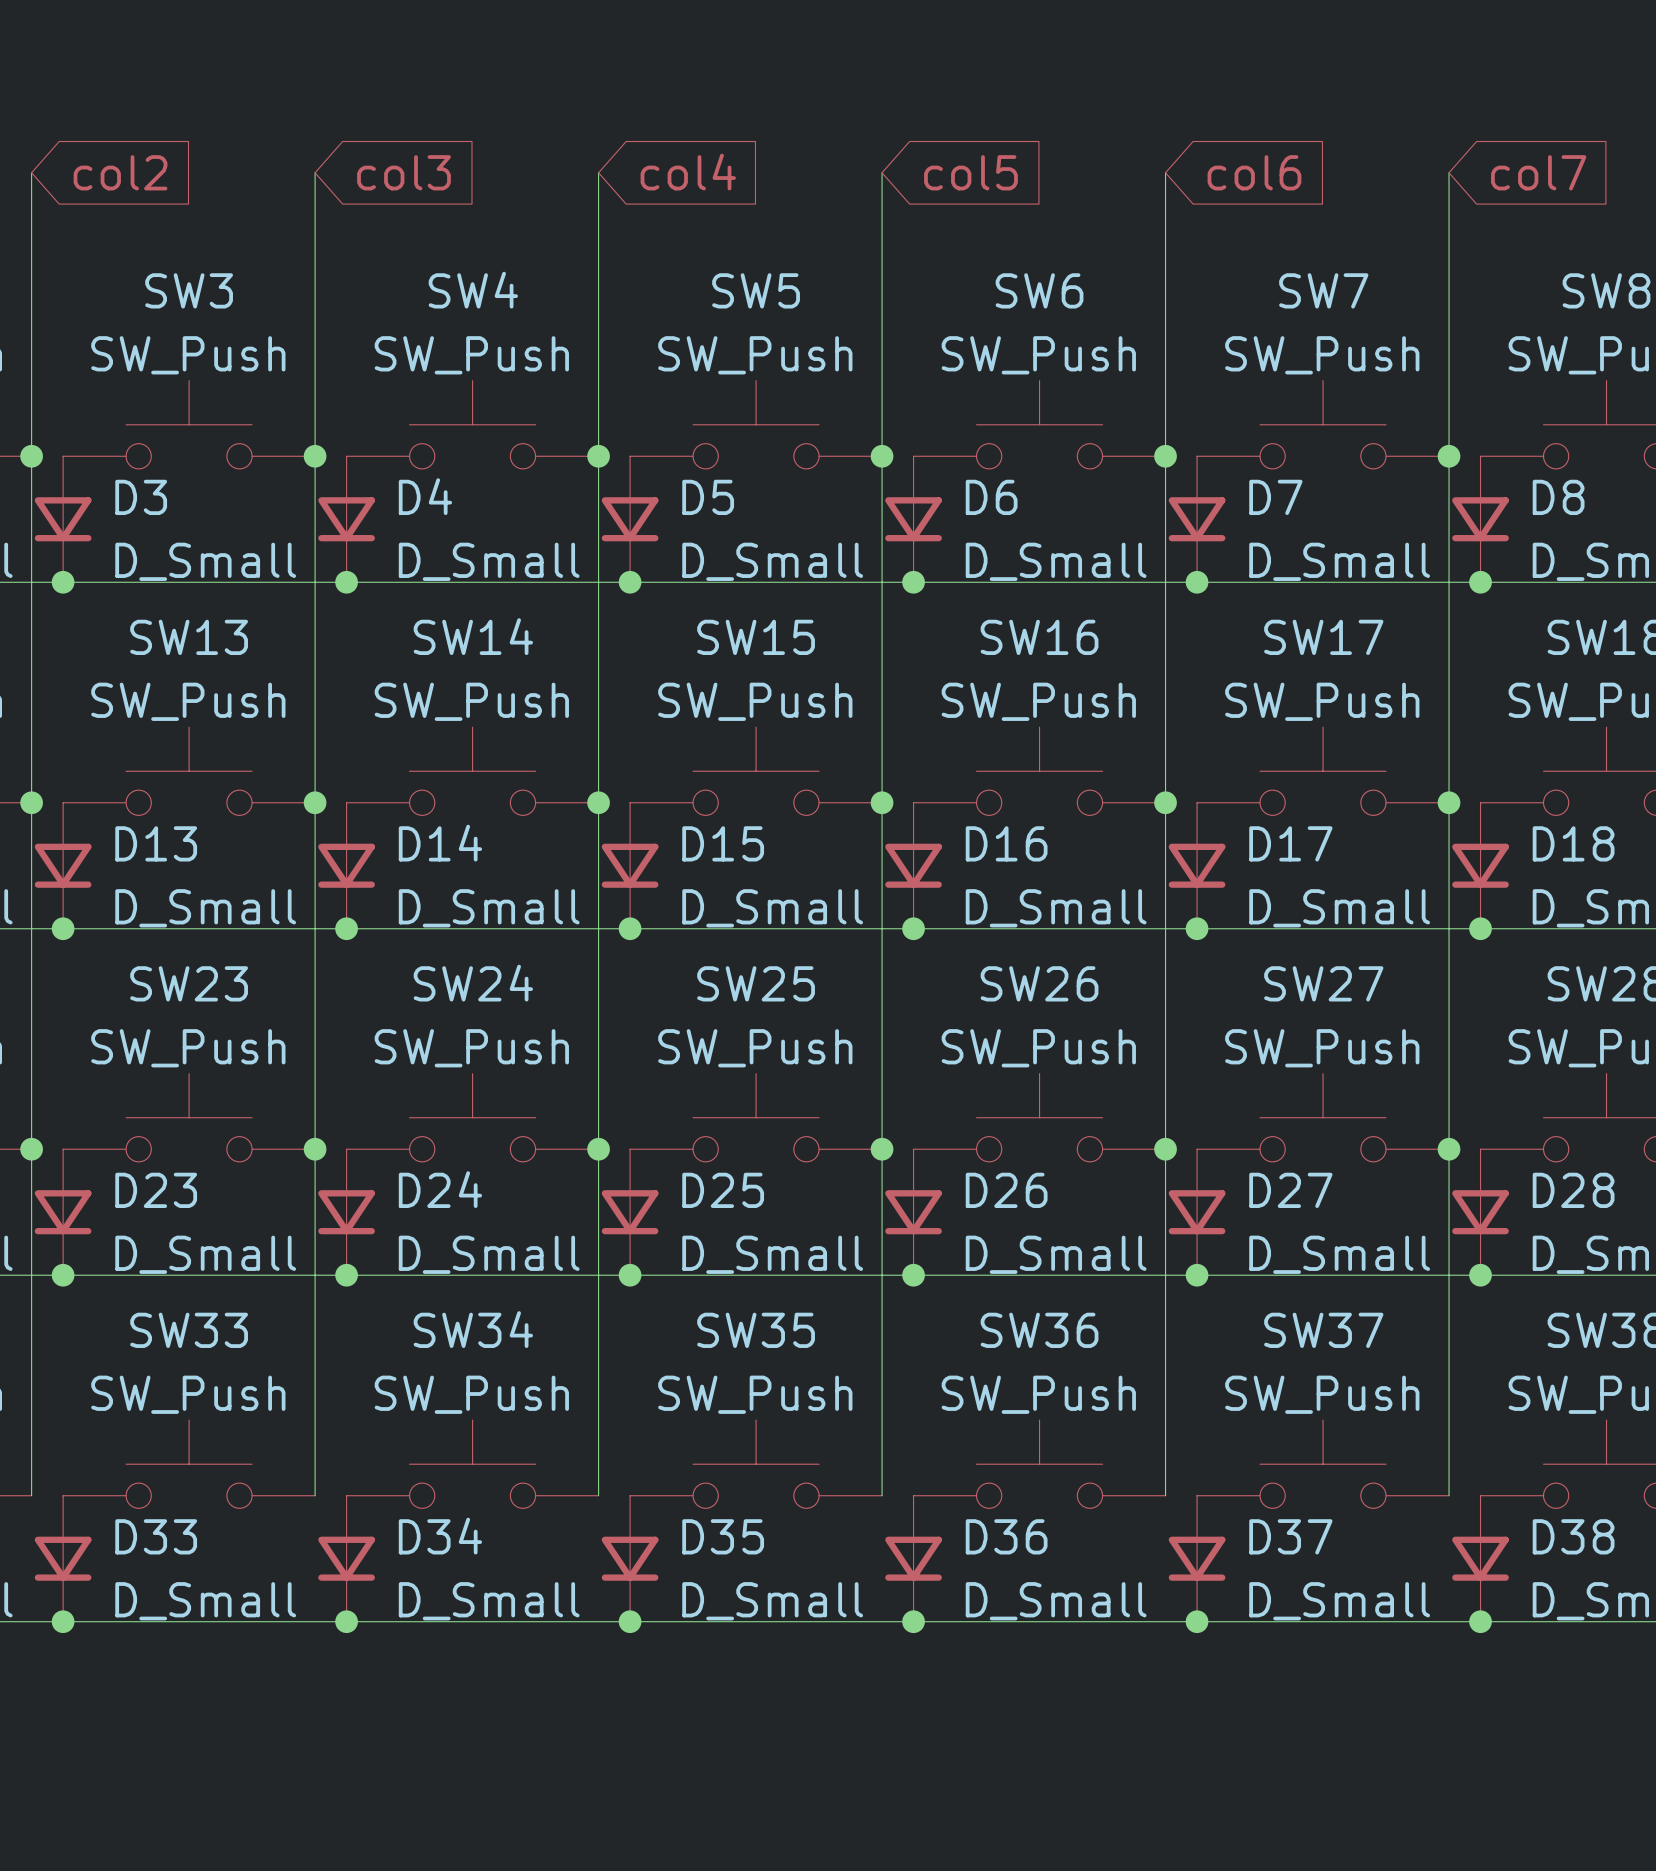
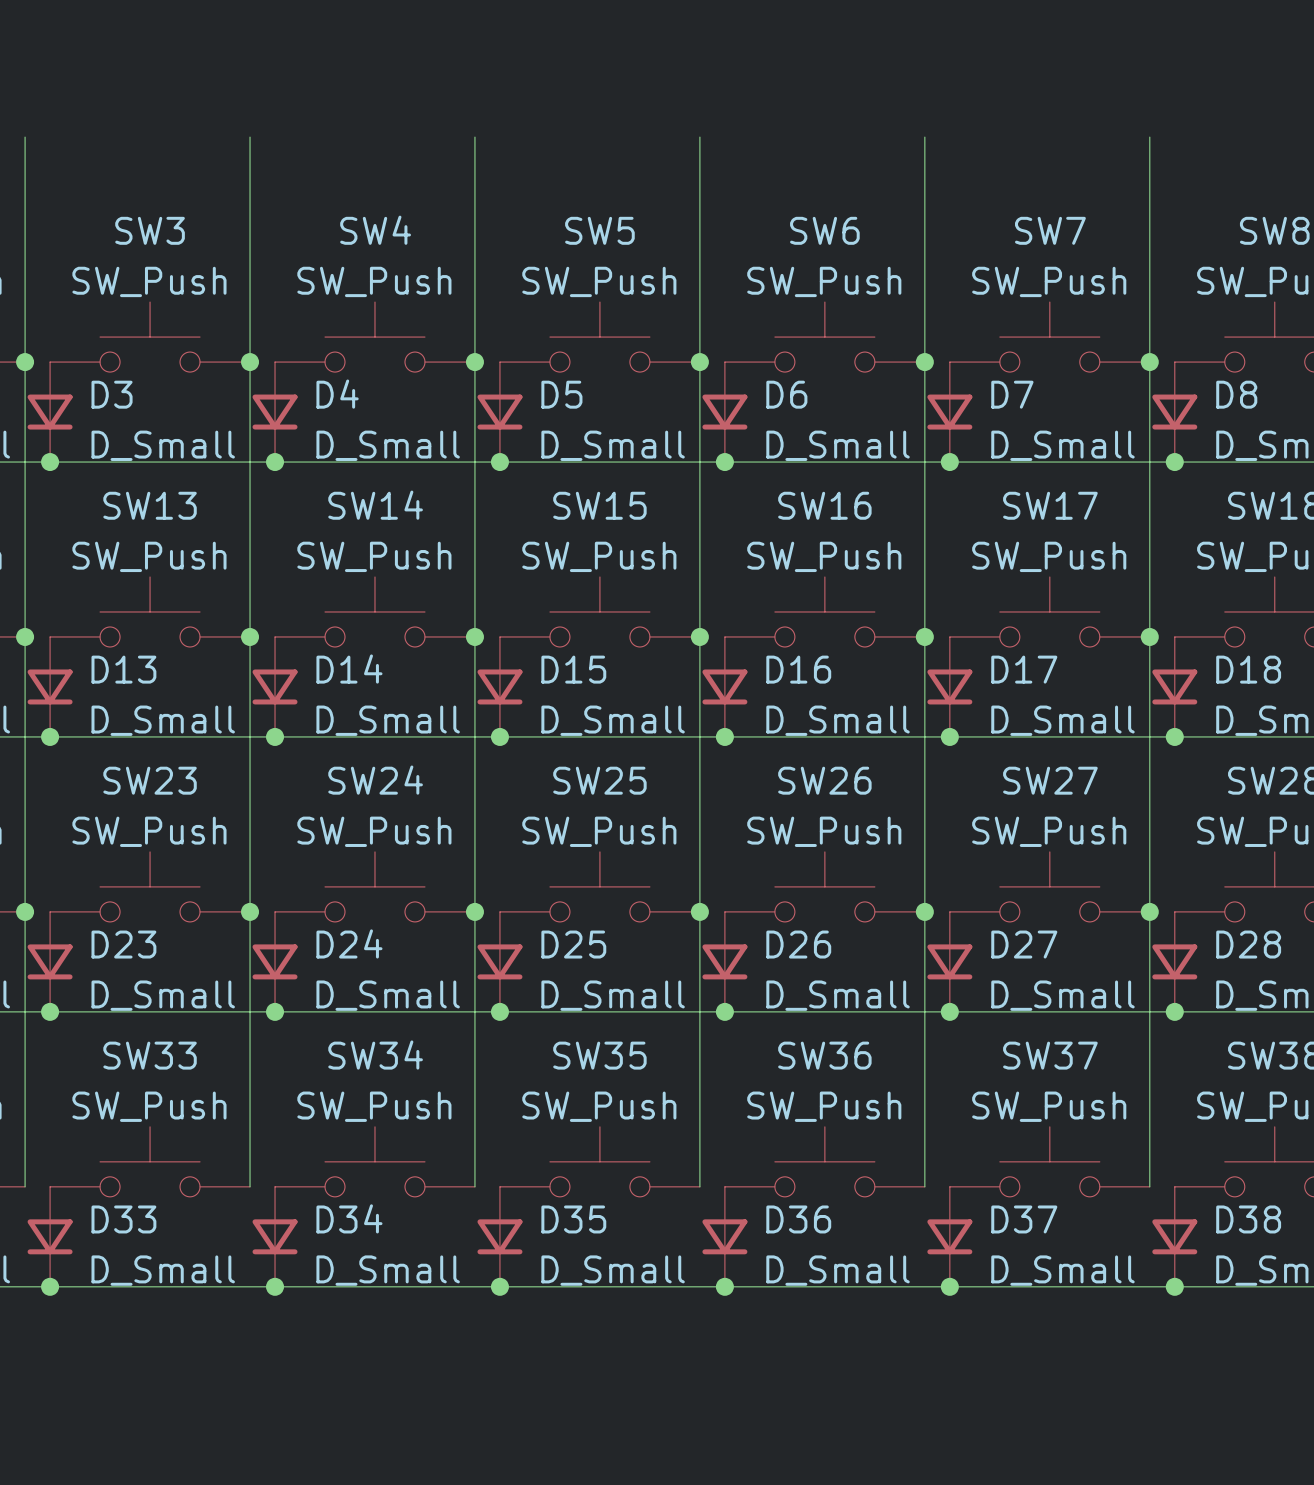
global label: col2 (120, 172) -> none
global label: col3 (404, 172) -> none
global label: col4 (688, 172) -> none
global label: col5 (970, 172) -> none
global label: col6 (1254, 172) -> none
global label: col7 (1538, 172) -> none

